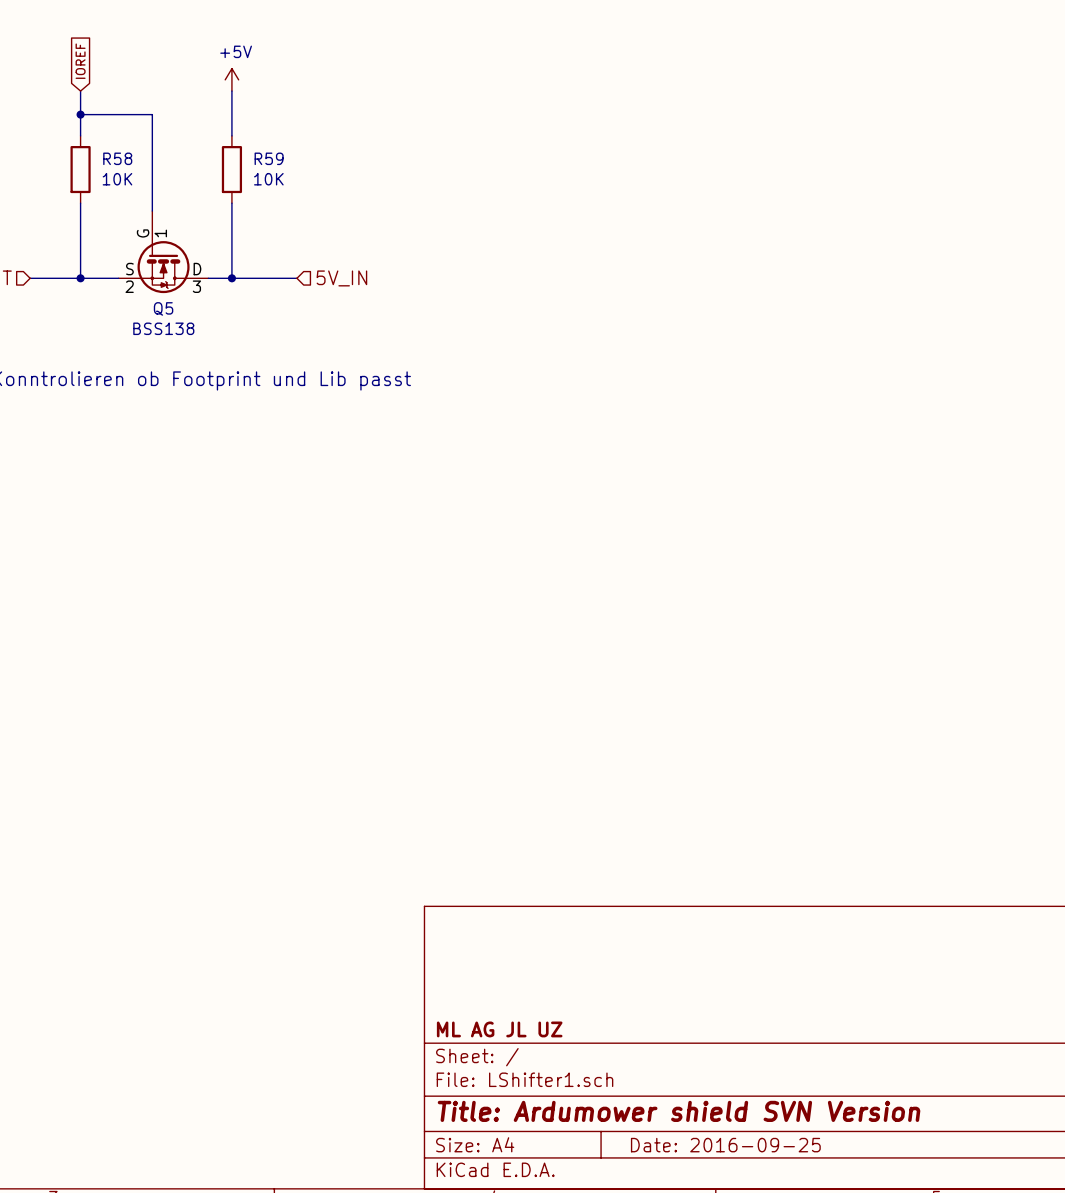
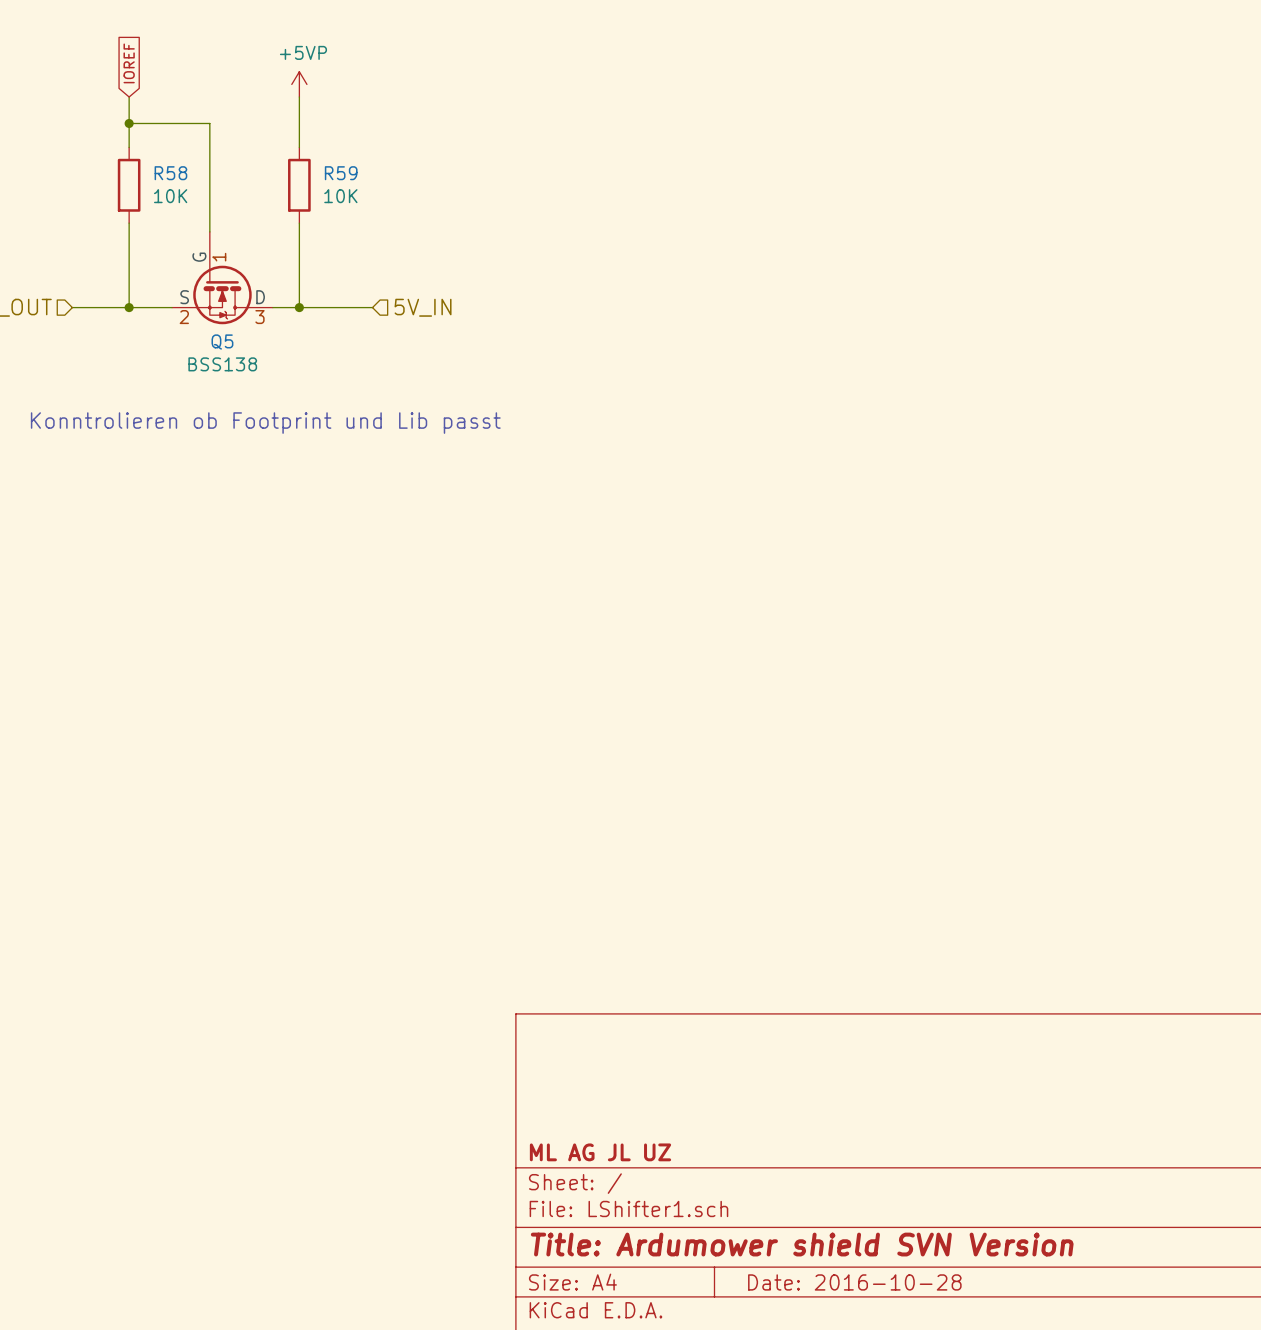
power symbol: +5V (231, 79) -> +5VP (299, 84)
title block: Date: 2016-09-25 (725, 1145) -> Date: 2016-10-28 (854, 1282)

